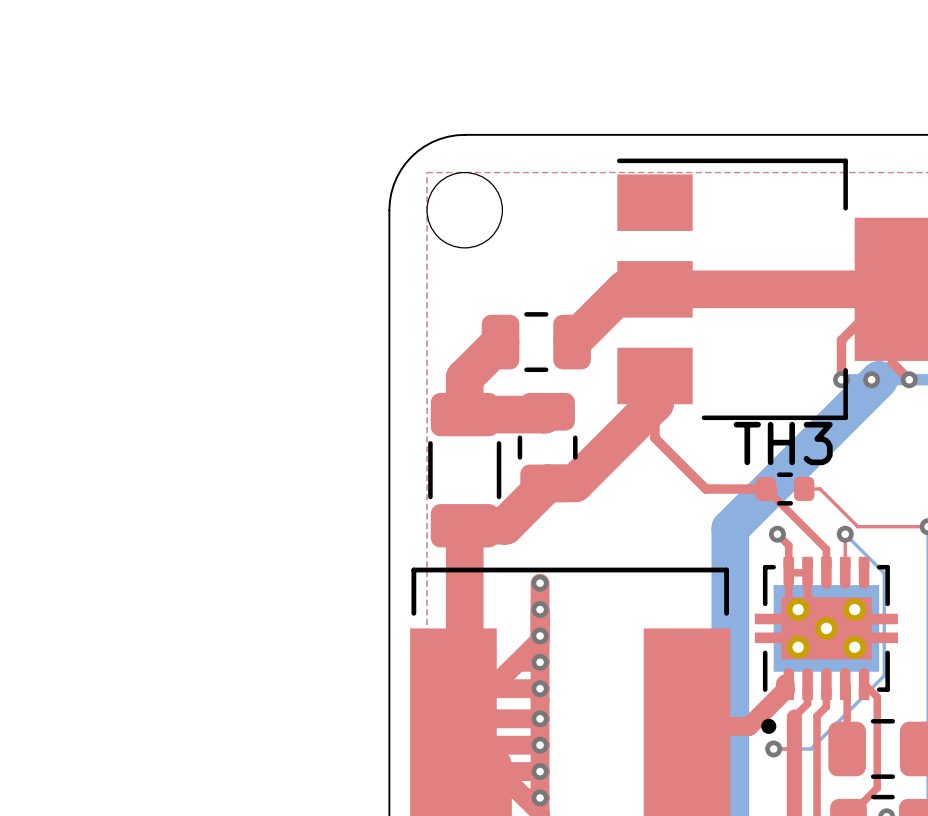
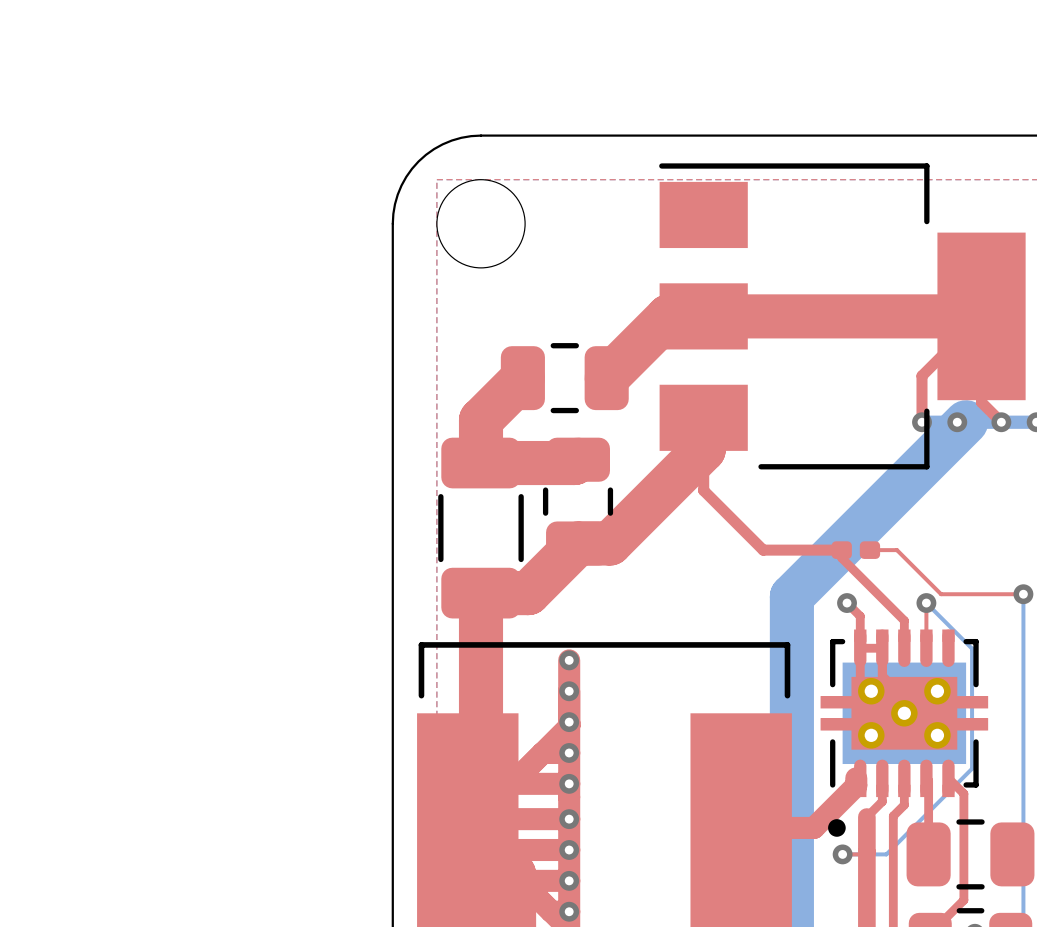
TH3: (784, 489) -> none
part: none -> (855, 550)

